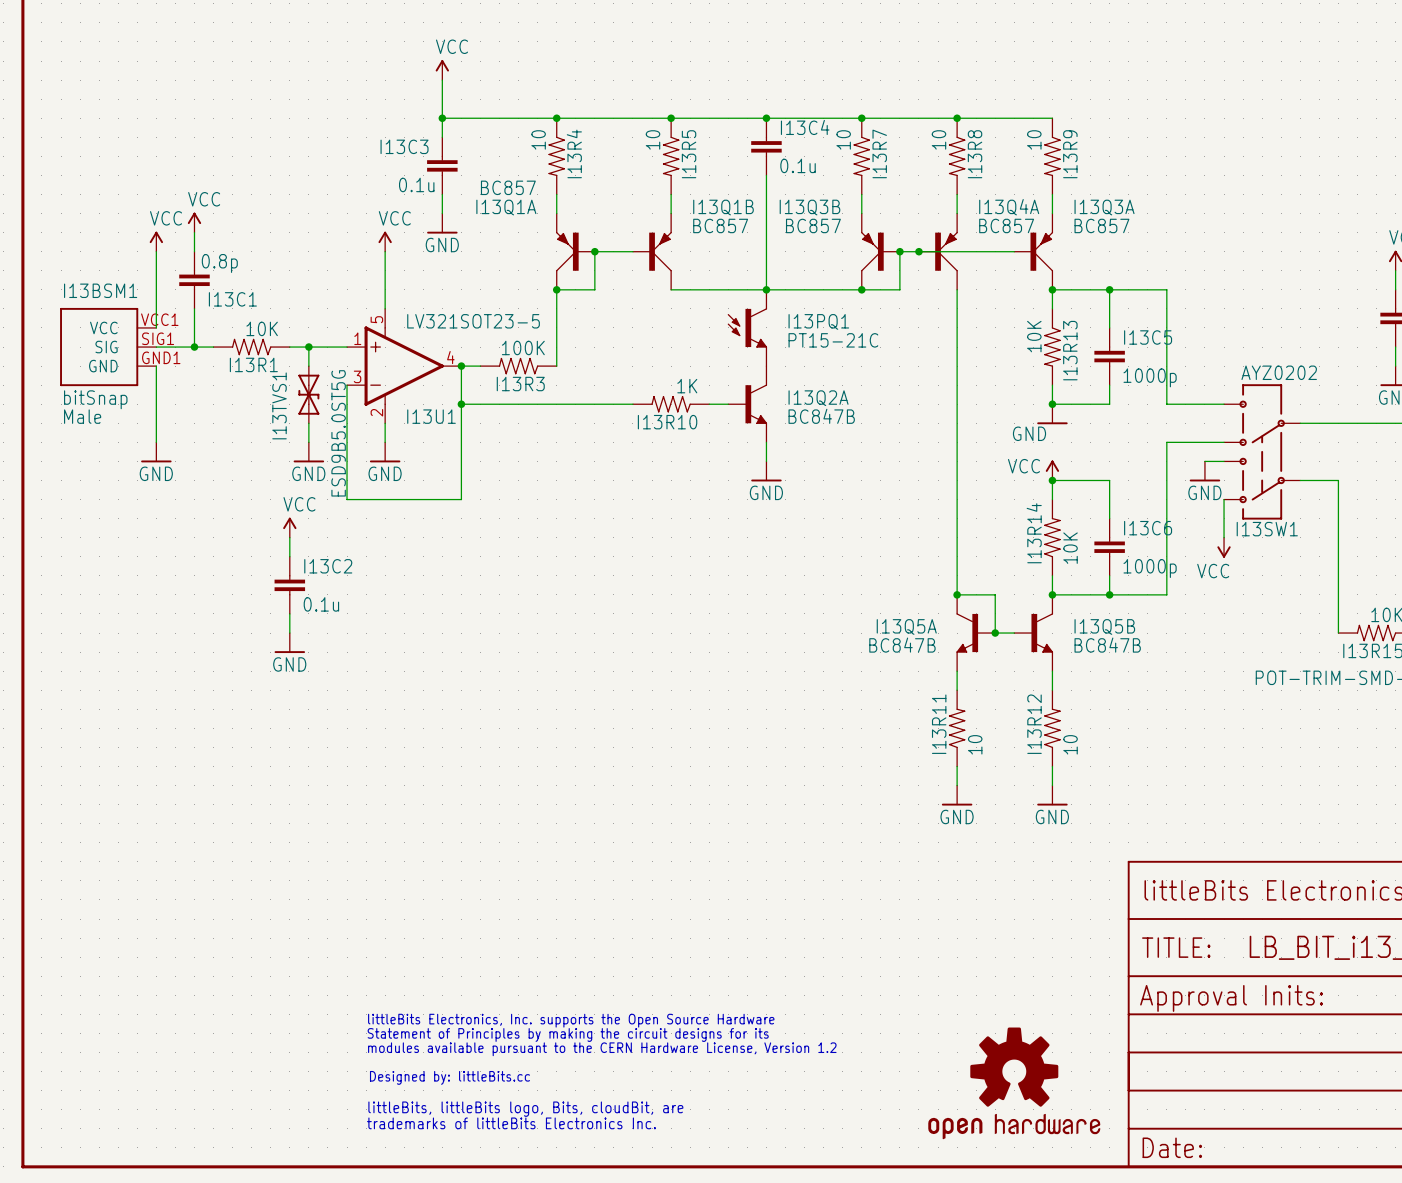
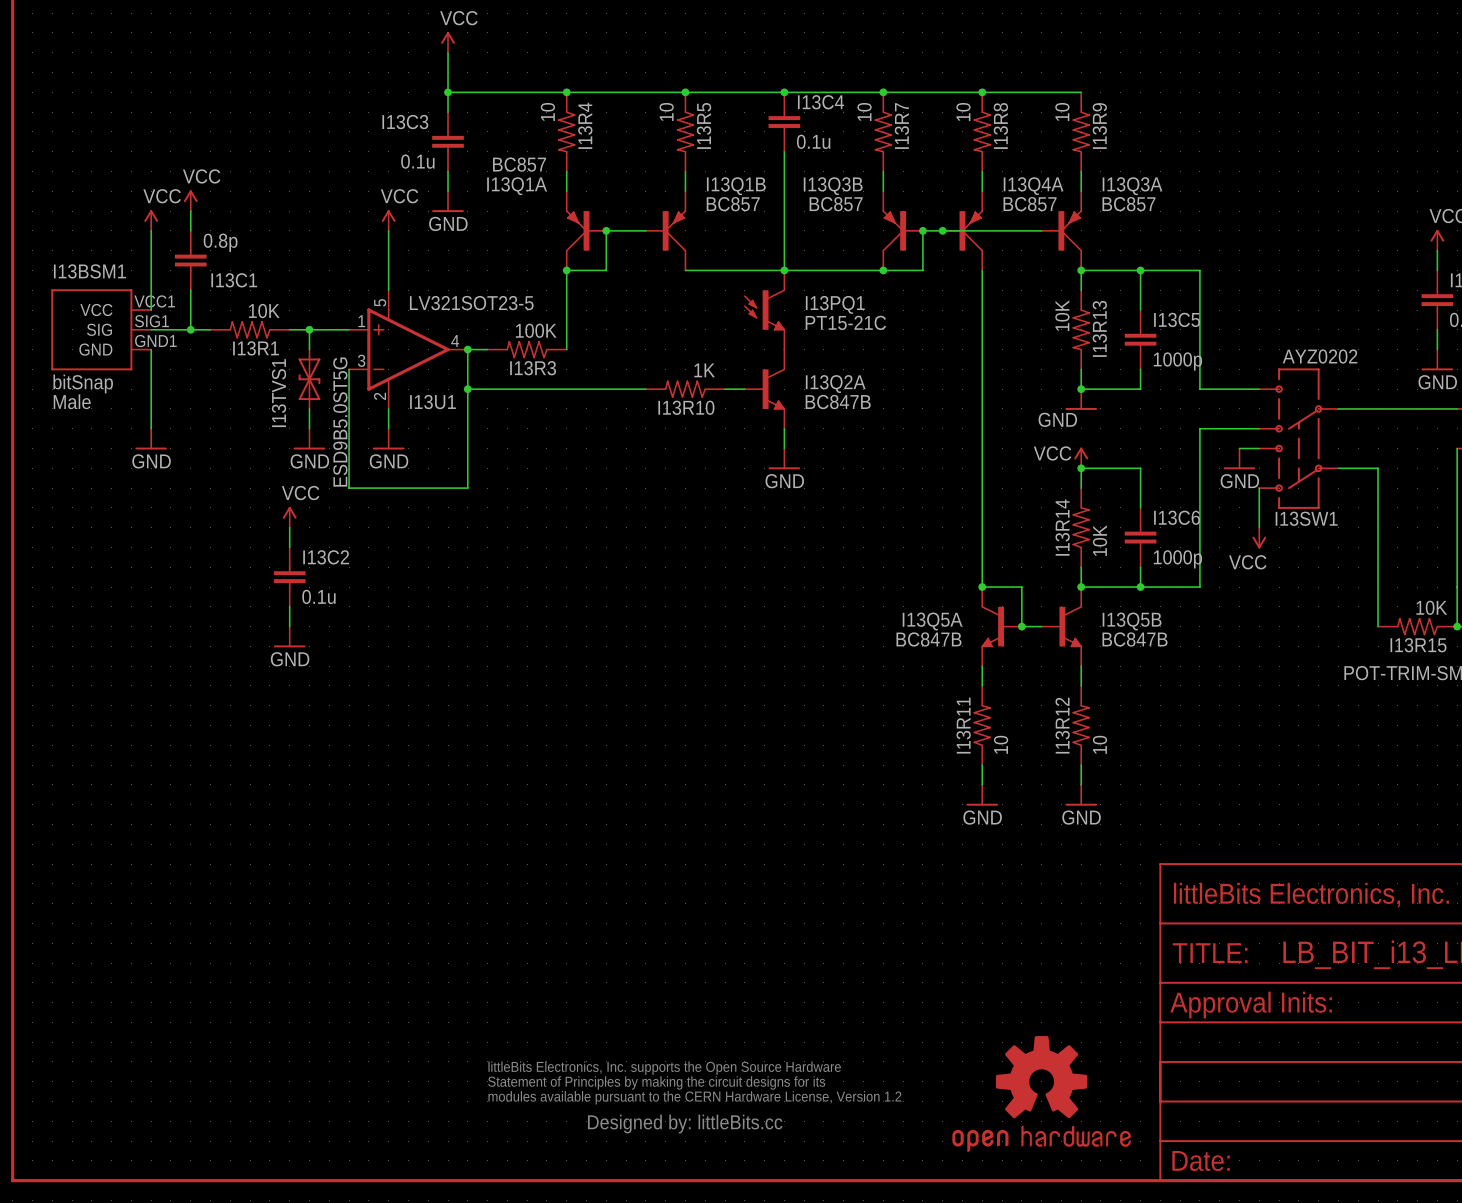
part: (601, 1071) -> none
part: none -> (694, 1097)

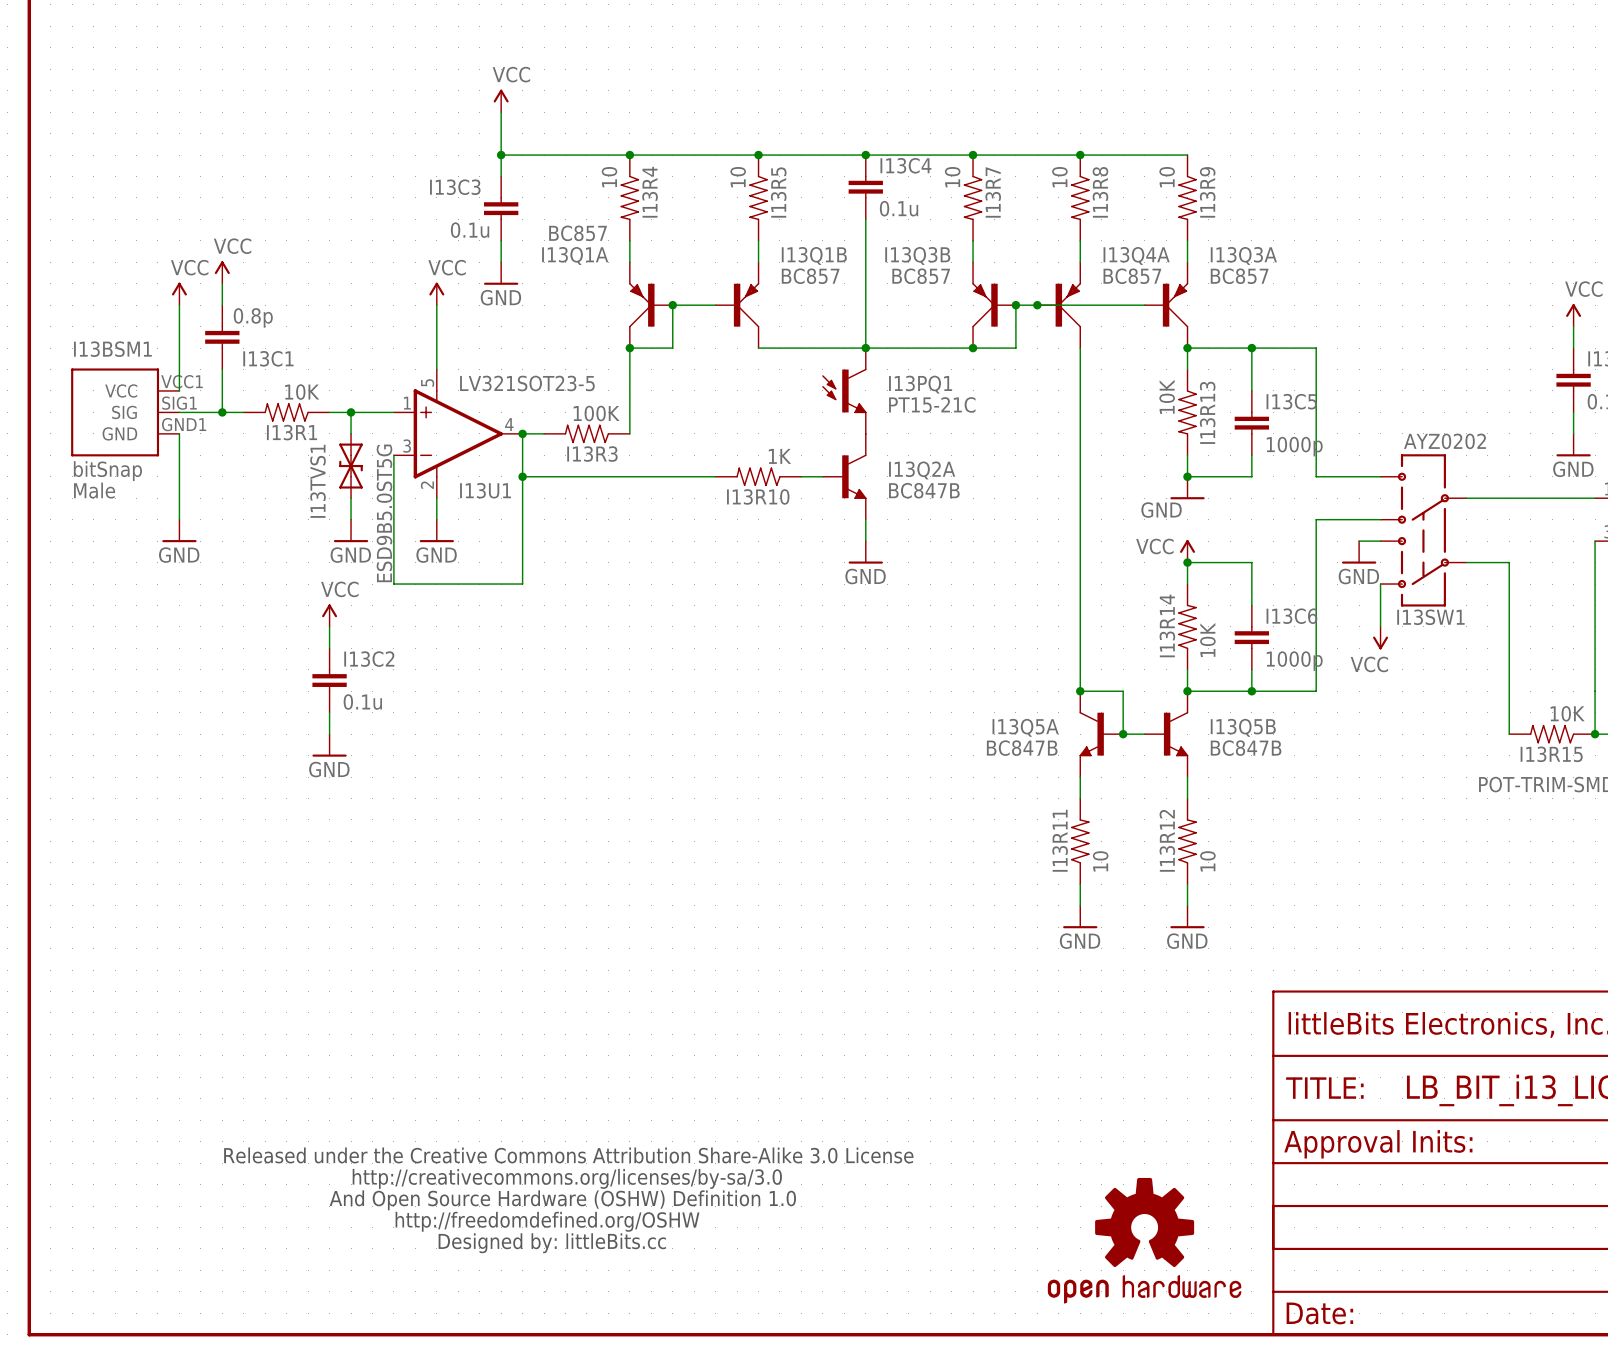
part: none -> (568, 1200)
part: (694, 1097) -> none

